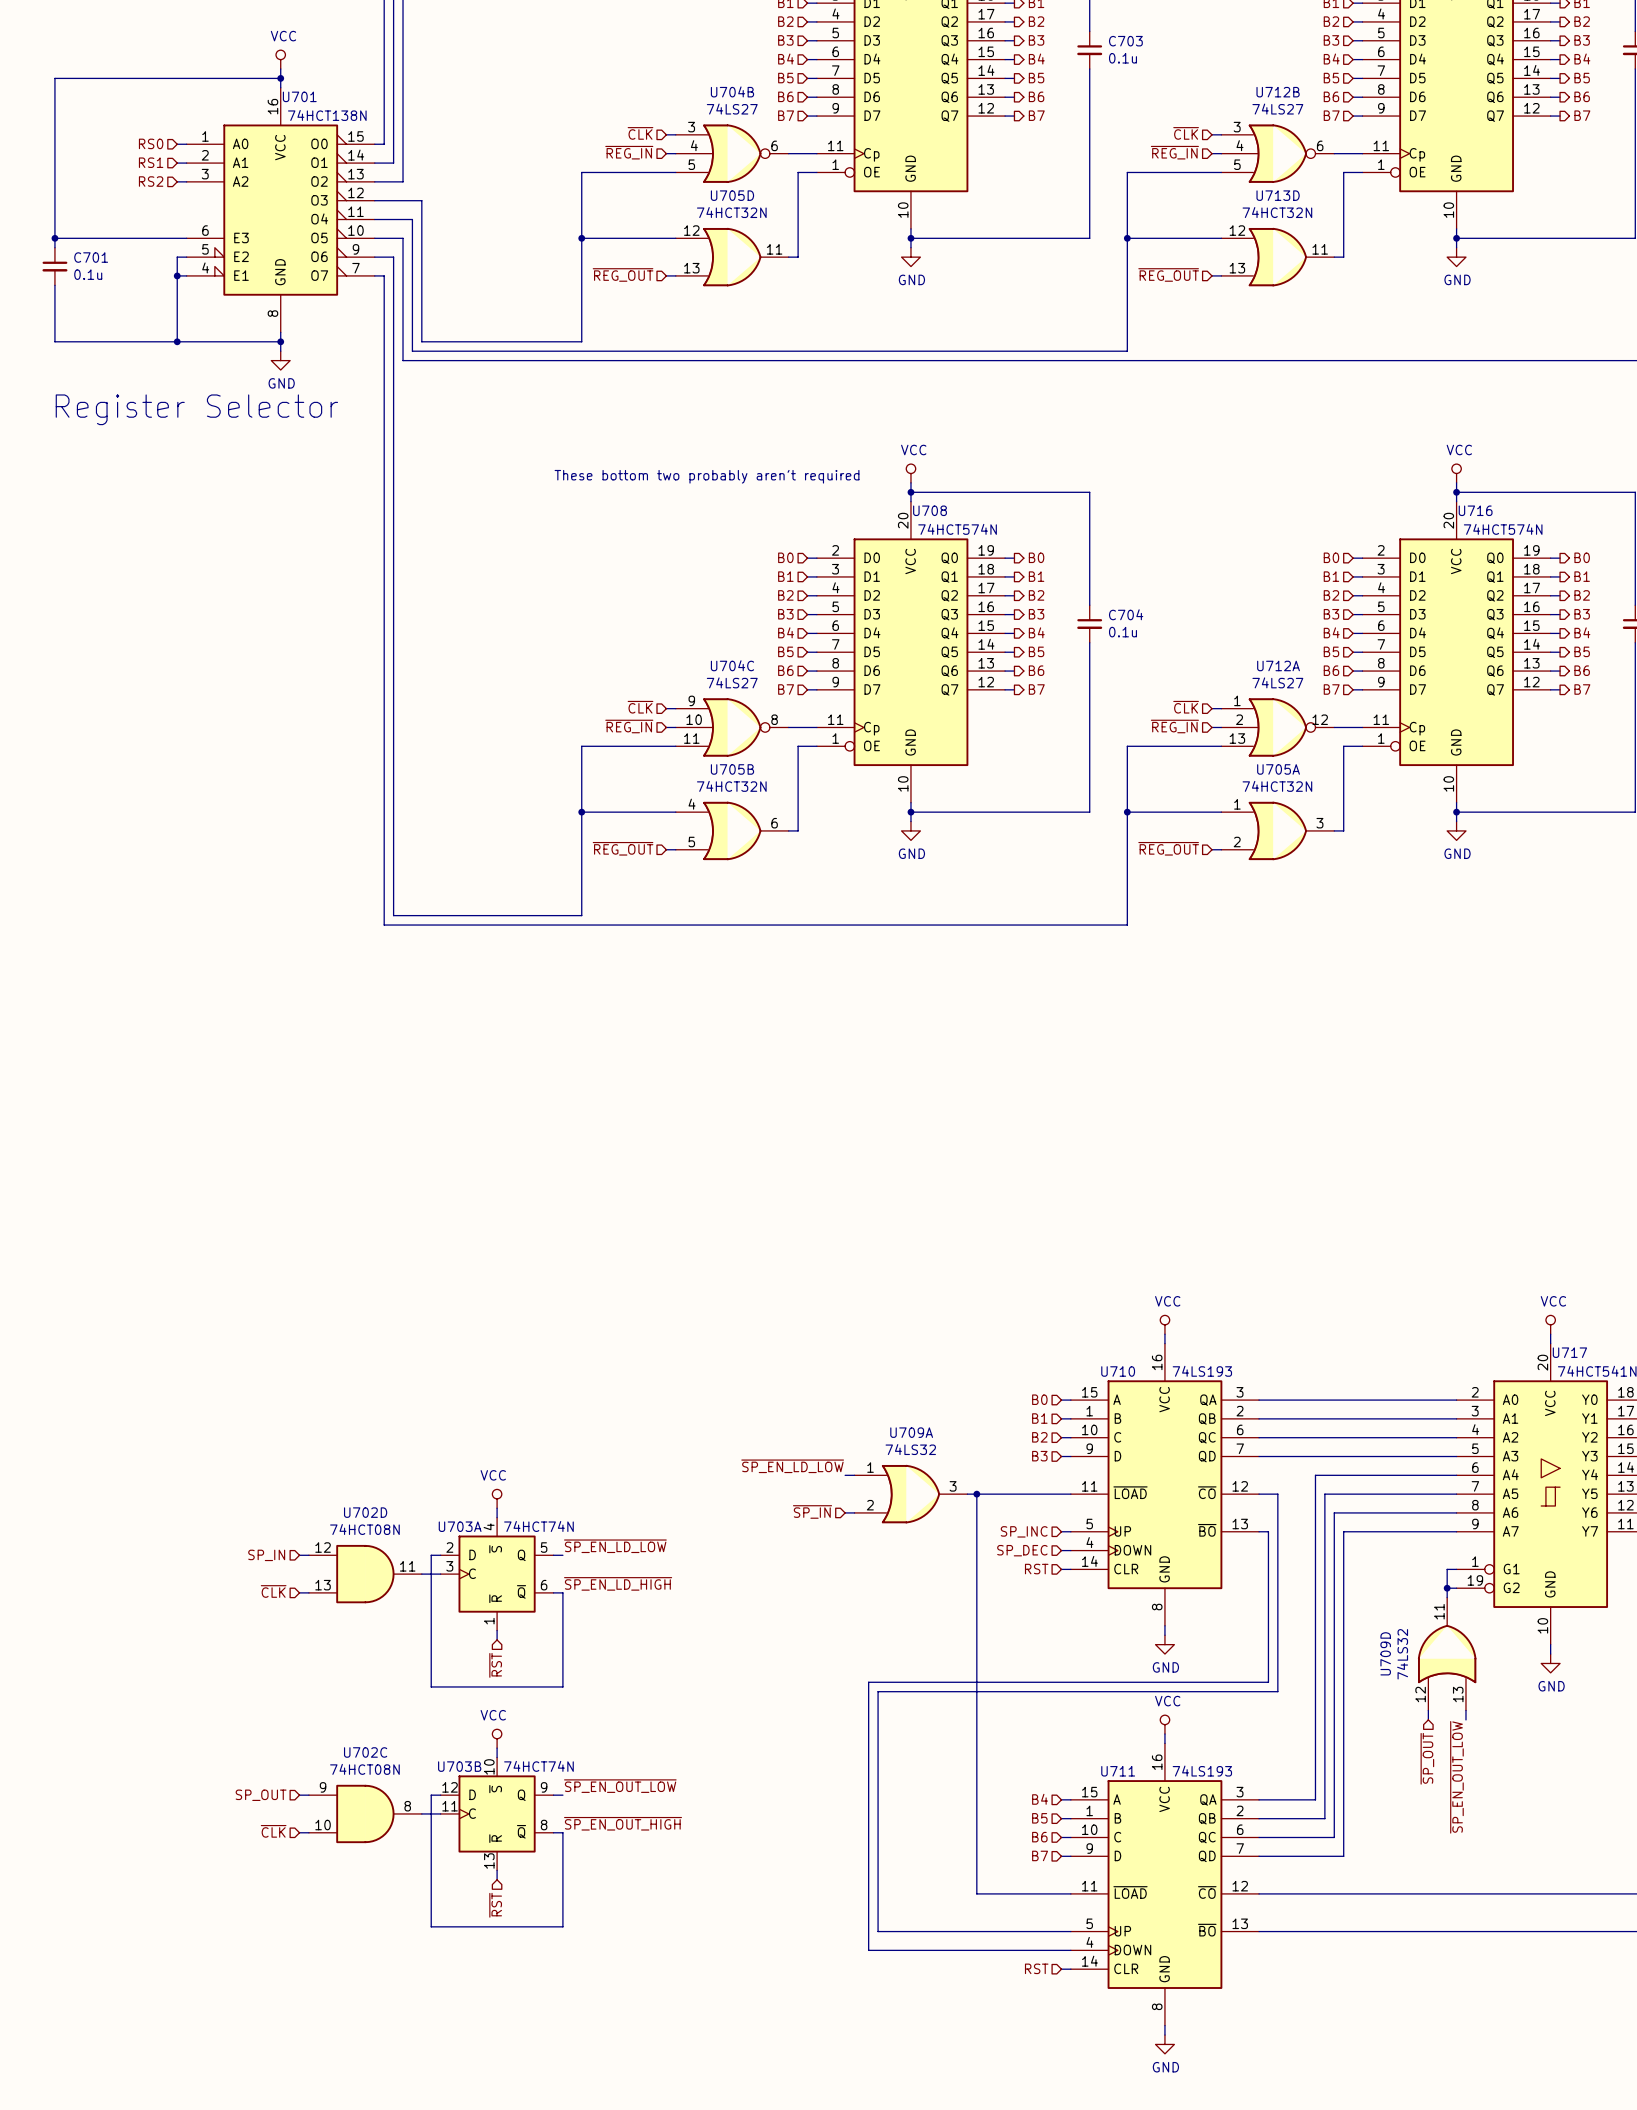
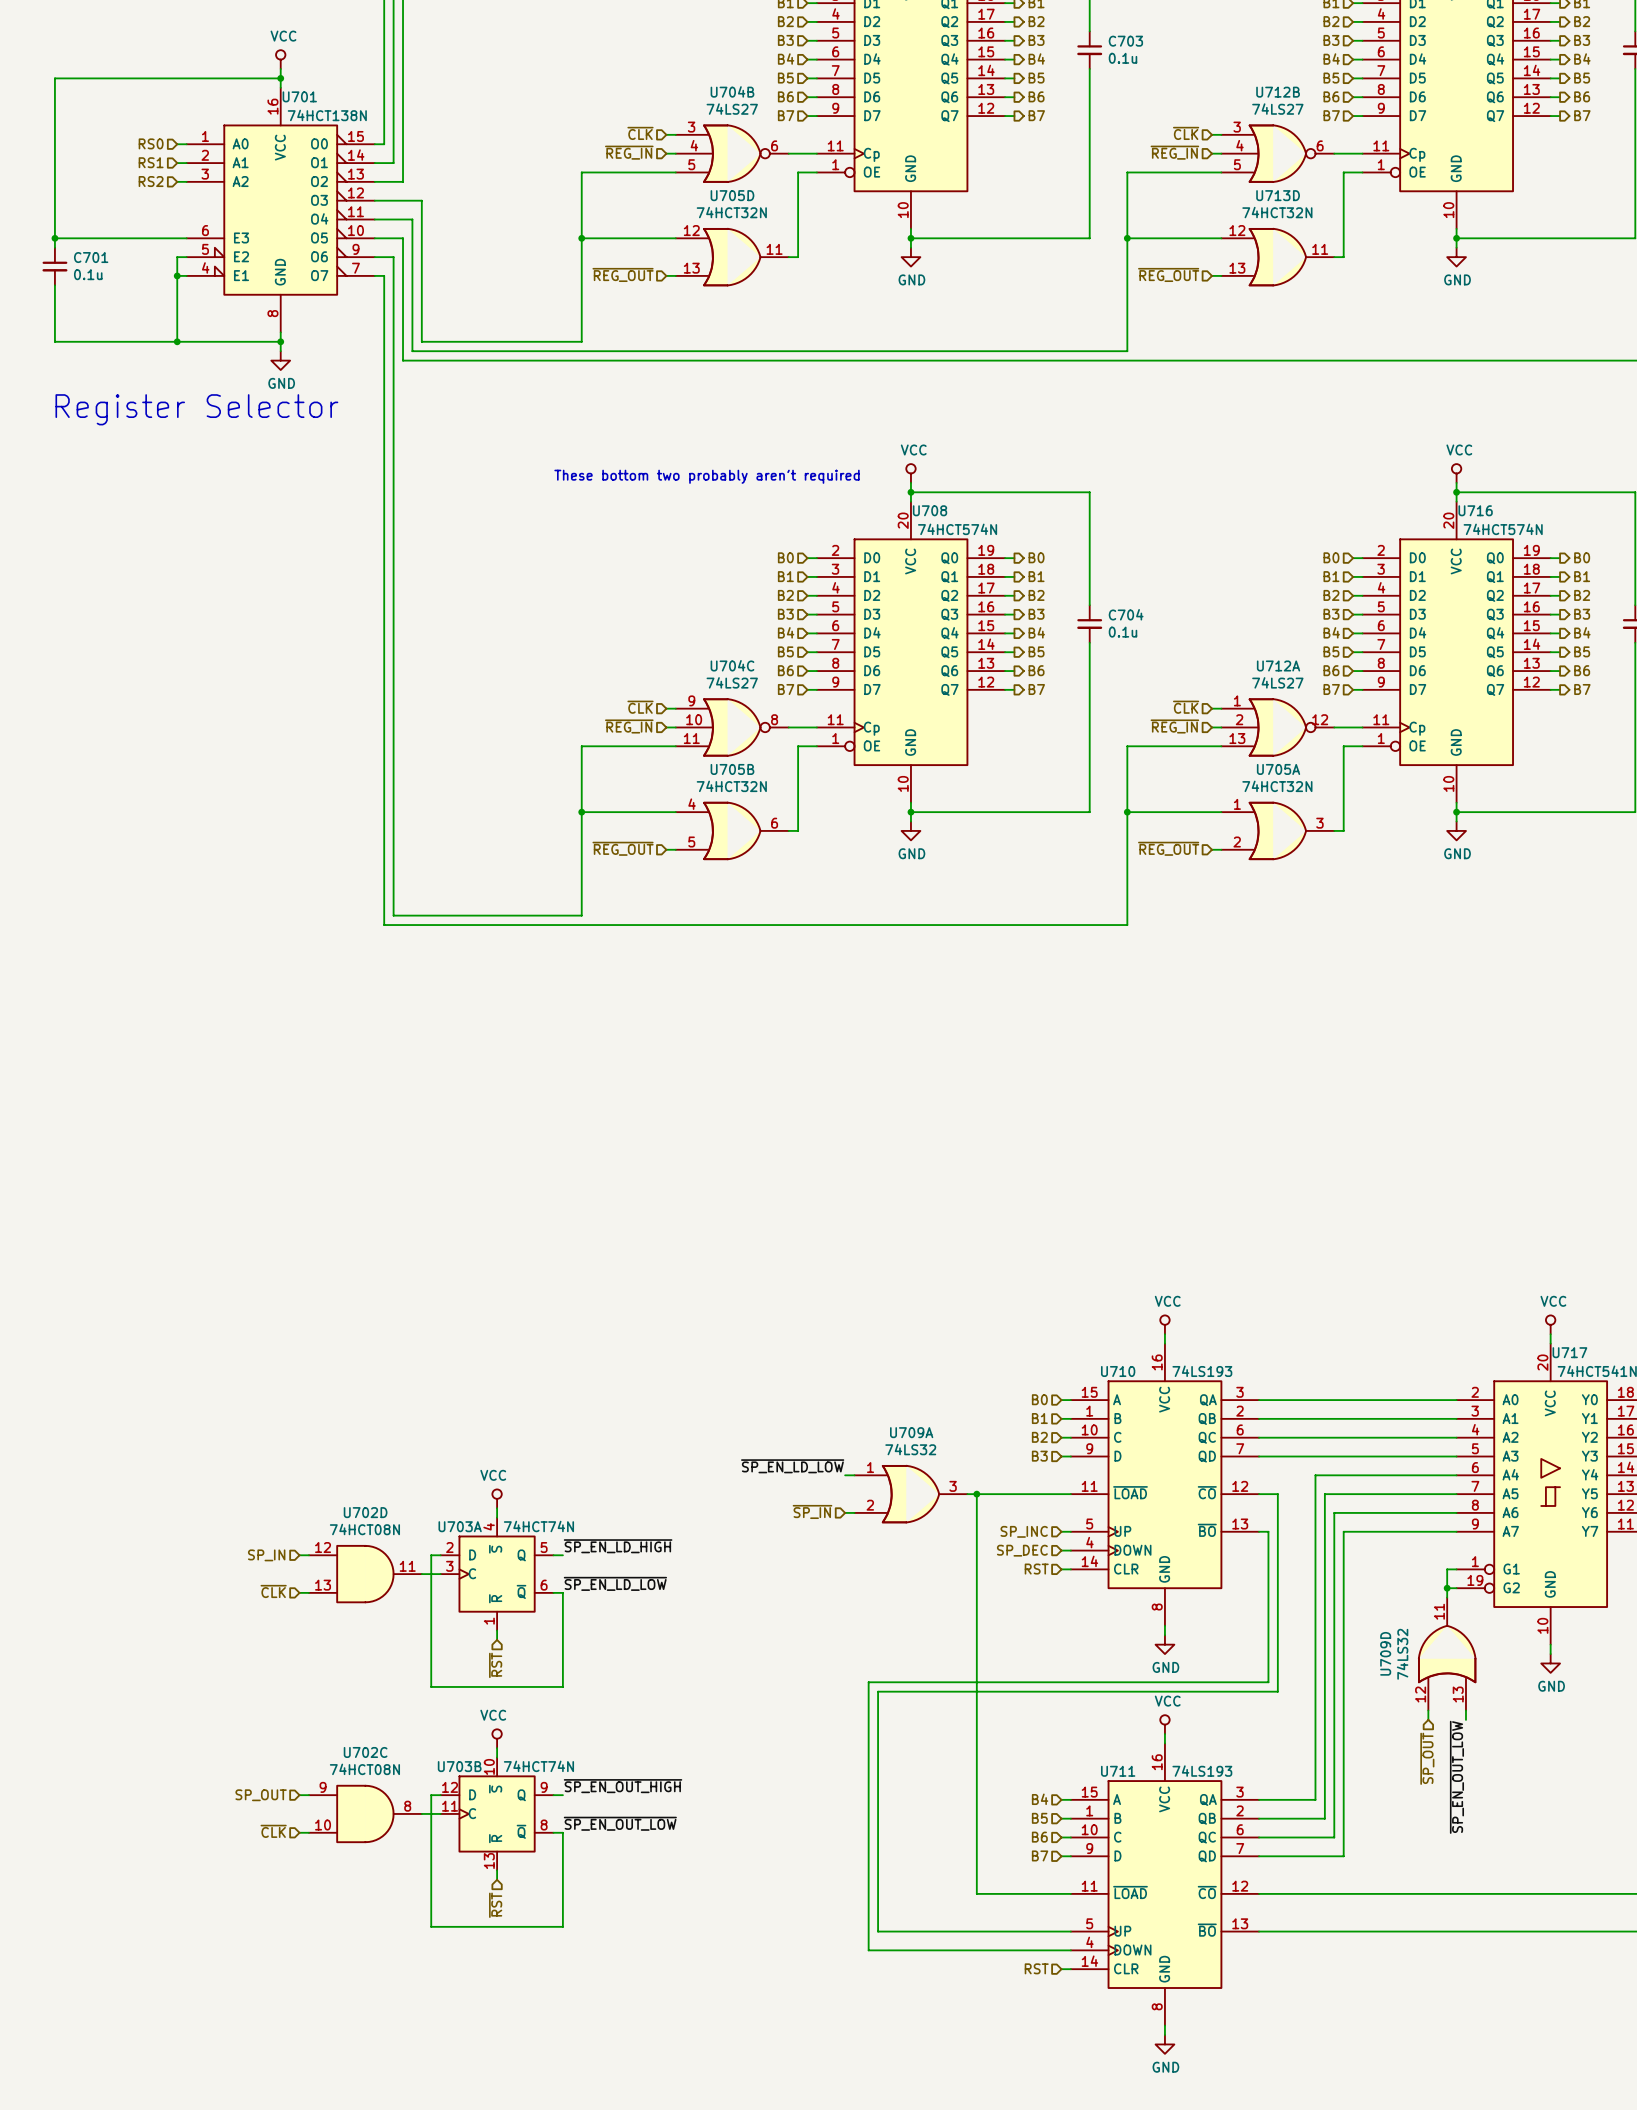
label: ~{SP_EN_LD_LOW} (615, 1546) -> ~{SP_EN_LD_HIGH} (618, 1546)
label: ~{SP_EN_LD_HIGH} (618, 1583) -> ~{SP_EN_LD_LOW} (615, 1583)
label: ~{SP_EN_OUT_LOW} (620, 1786) -> ~{SP_EN_OUT_HIGH} (623, 1786)
label: ~{SP_EN_OUT_HIGH} (623, 1823) -> ~{SP_EN_OUT_LOW} (620, 1823)

